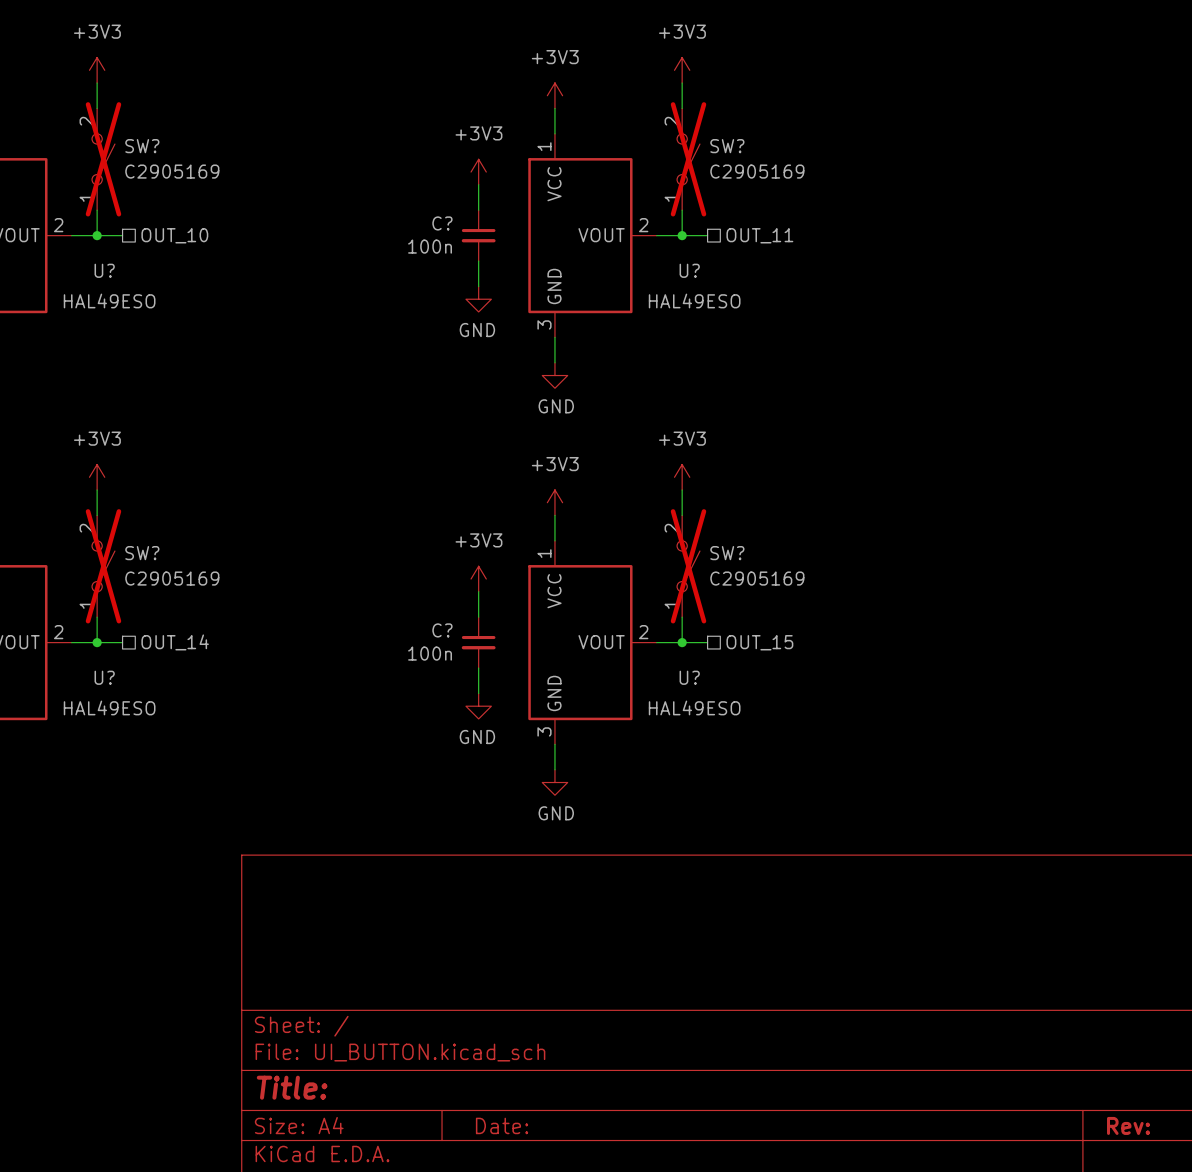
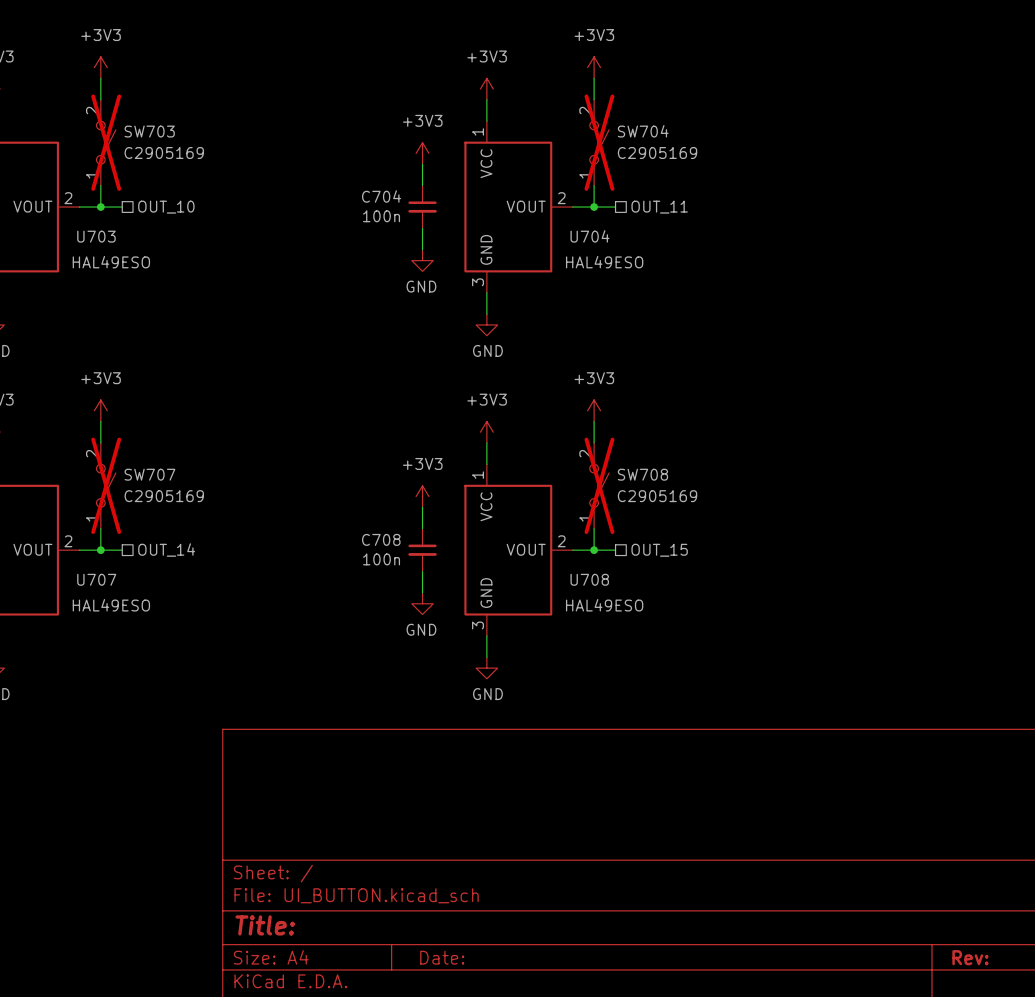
SW? name: SW? (142, 146) -> SW703 (149, 131)
SW? name: SW? (727, 146) -> SW704 (643, 131)
C? name: C? (442, 223) -> C704 (381, 196)
U? name: U? (104, 270) -> U703 (96, 236)
U? name: U? (689, 270) -> U704 (589, 236)
SW? name: SW? (142, 553) -> SW707 (149, 474)
SW? name: SW? (727, 553) -> SW708 (642, 474)
C? name: C? (442, 630) -> C708 (381, 539)
U? name: U? (104, 677) -> U707 (96, 579)
U? name: U? (689, 677) -> U708 (589, 579)

